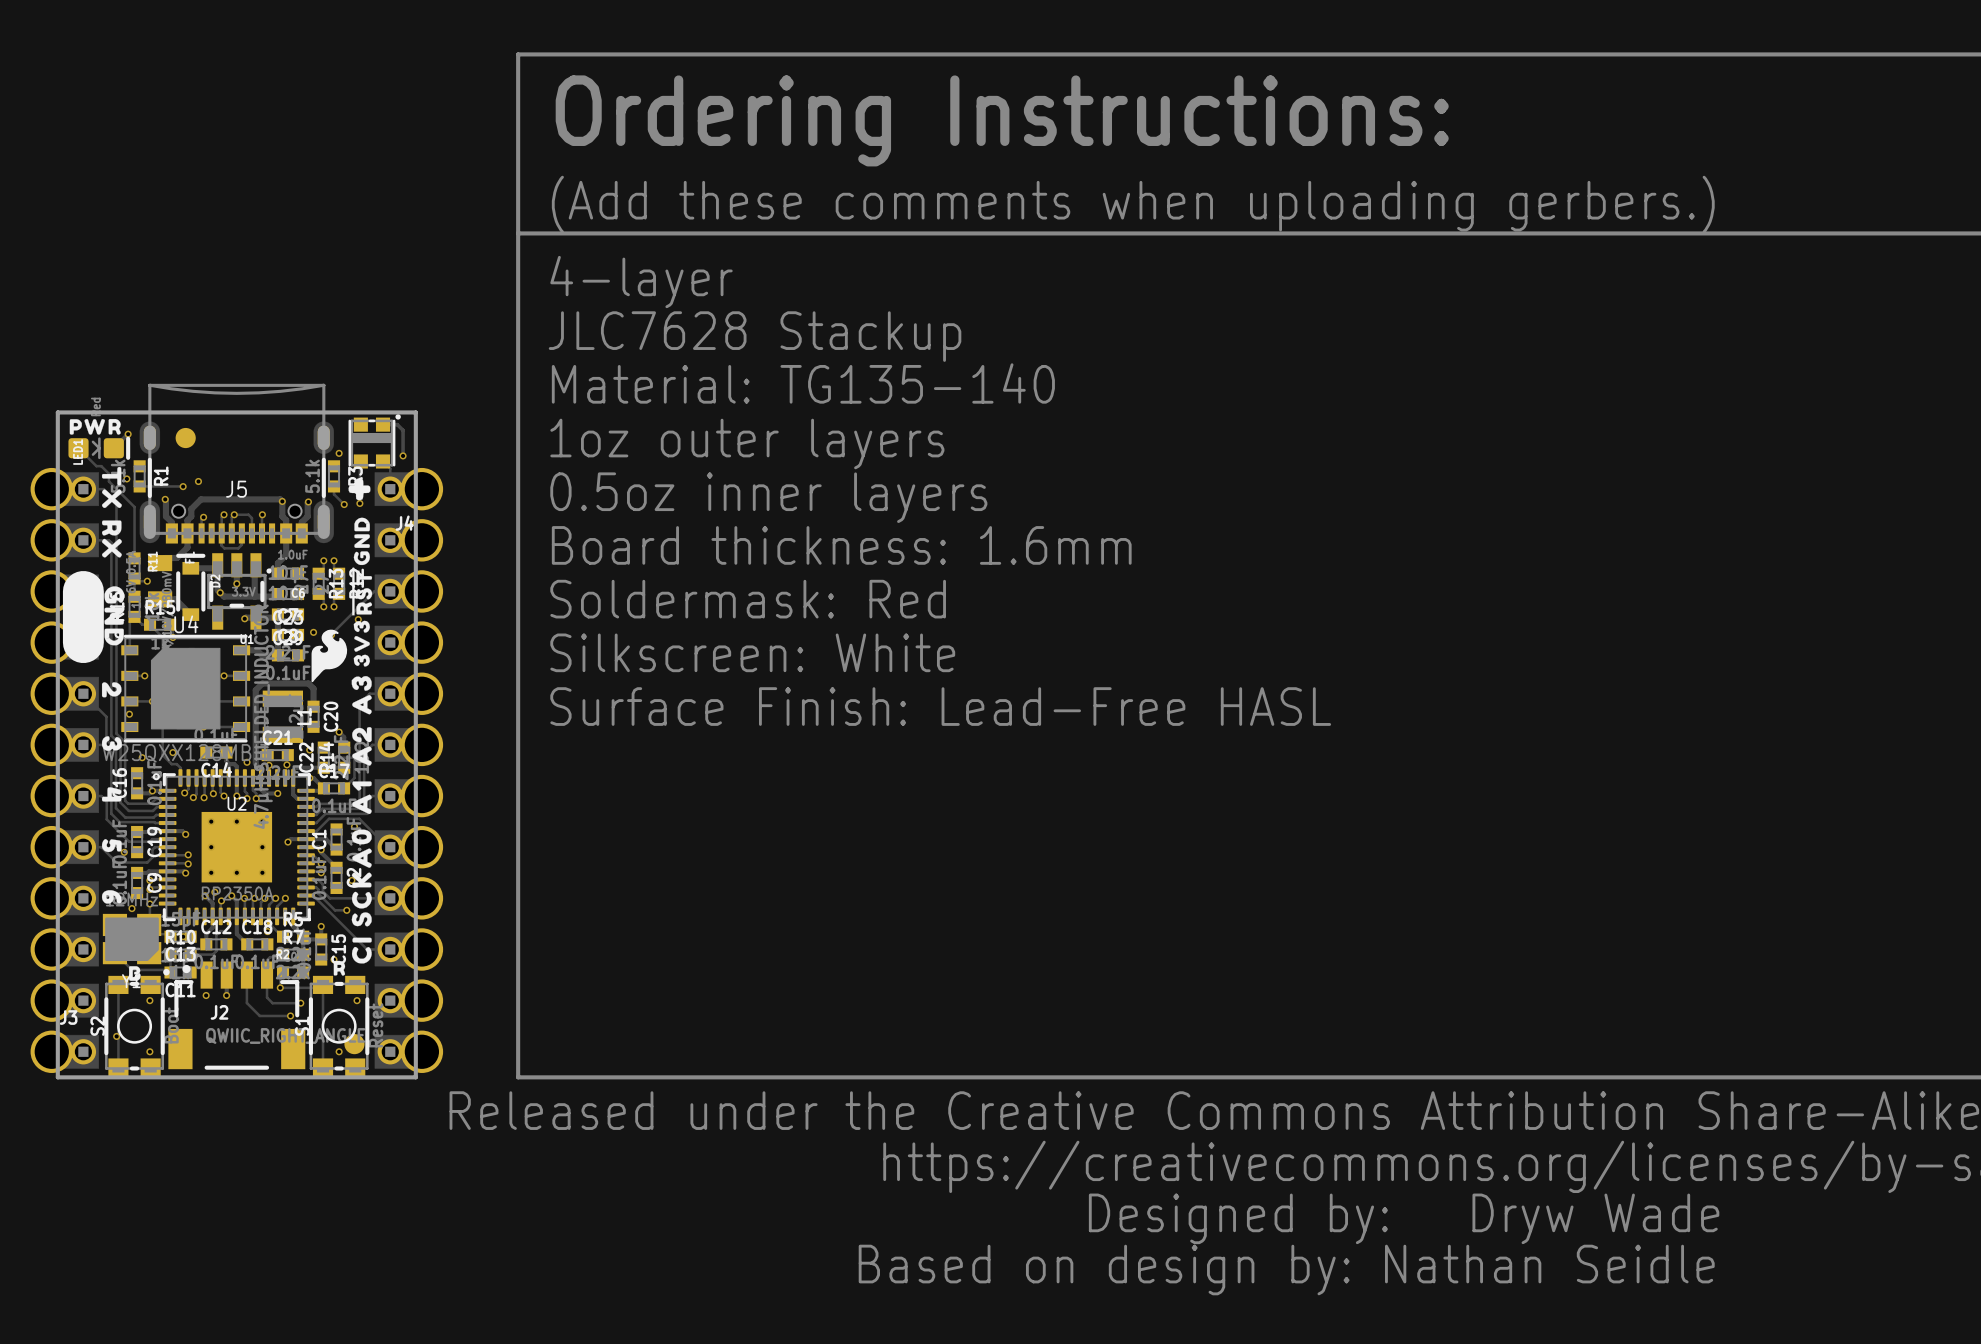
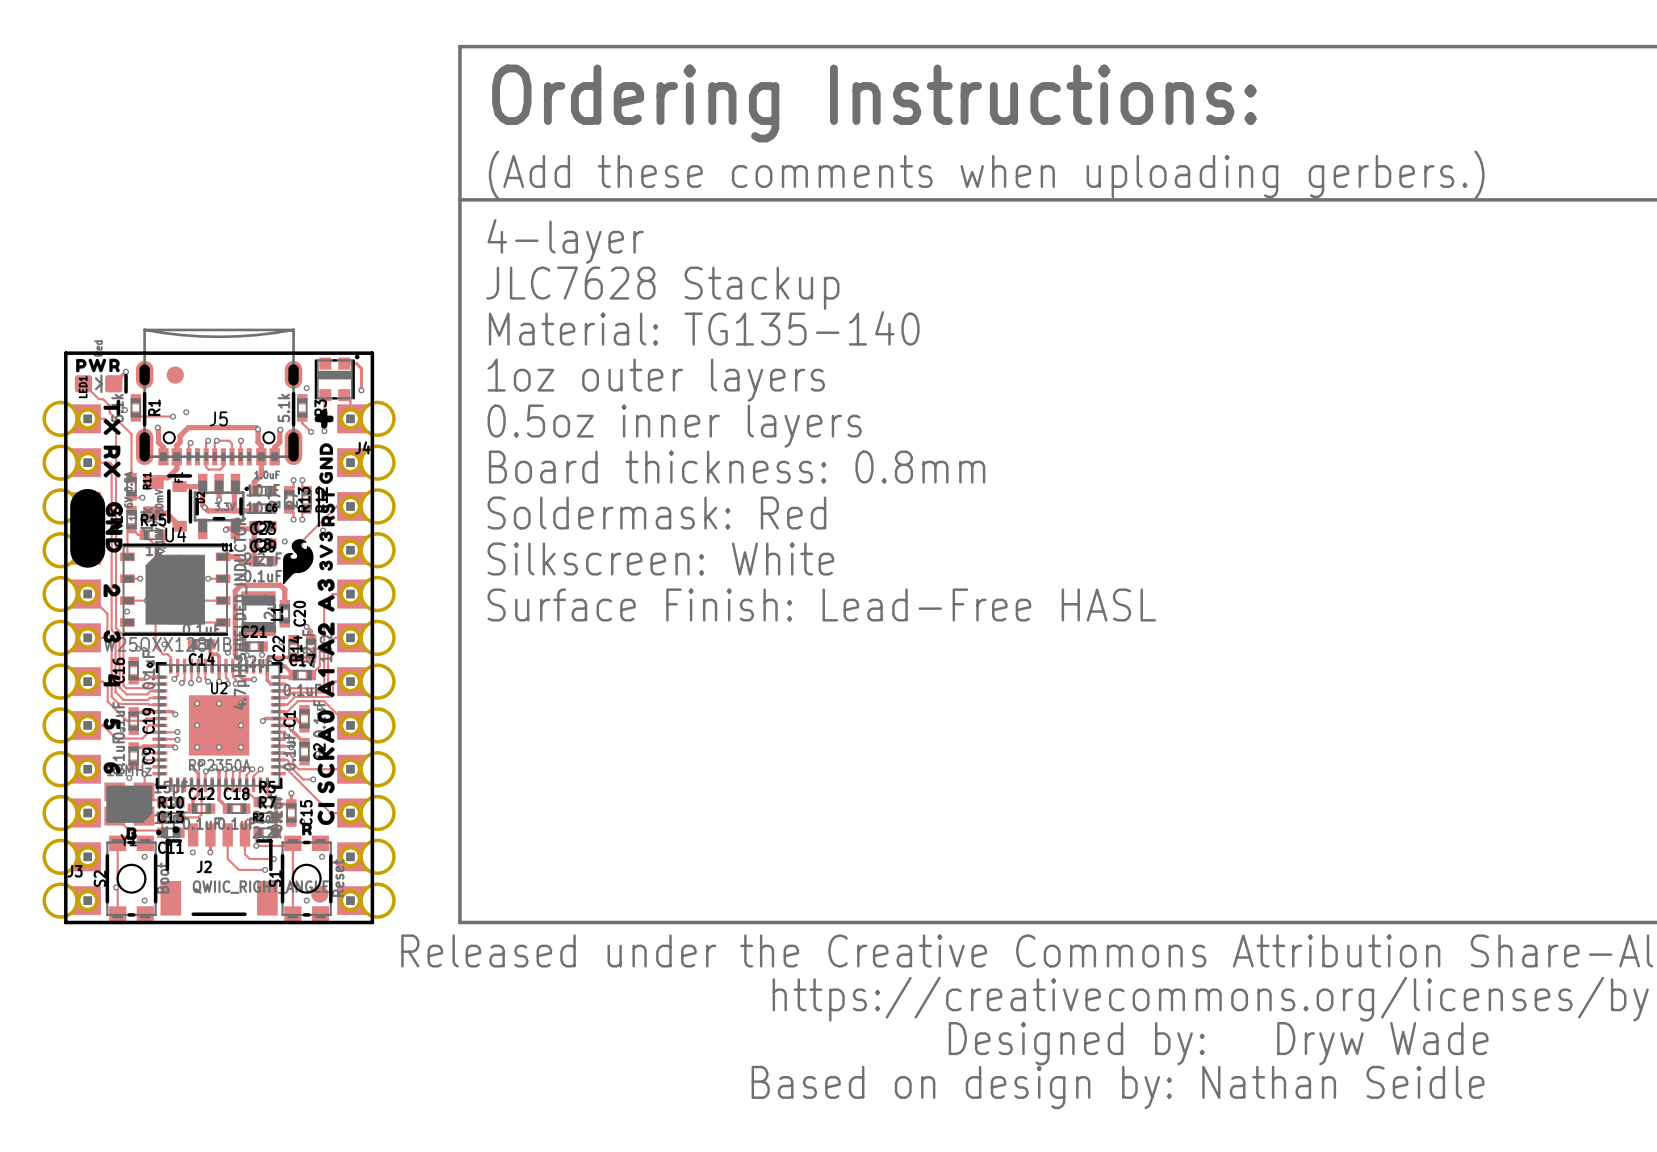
text: Board thickness: 1.6mm (841, 545) -> Board thickness: 0.8mm (737, 467)

